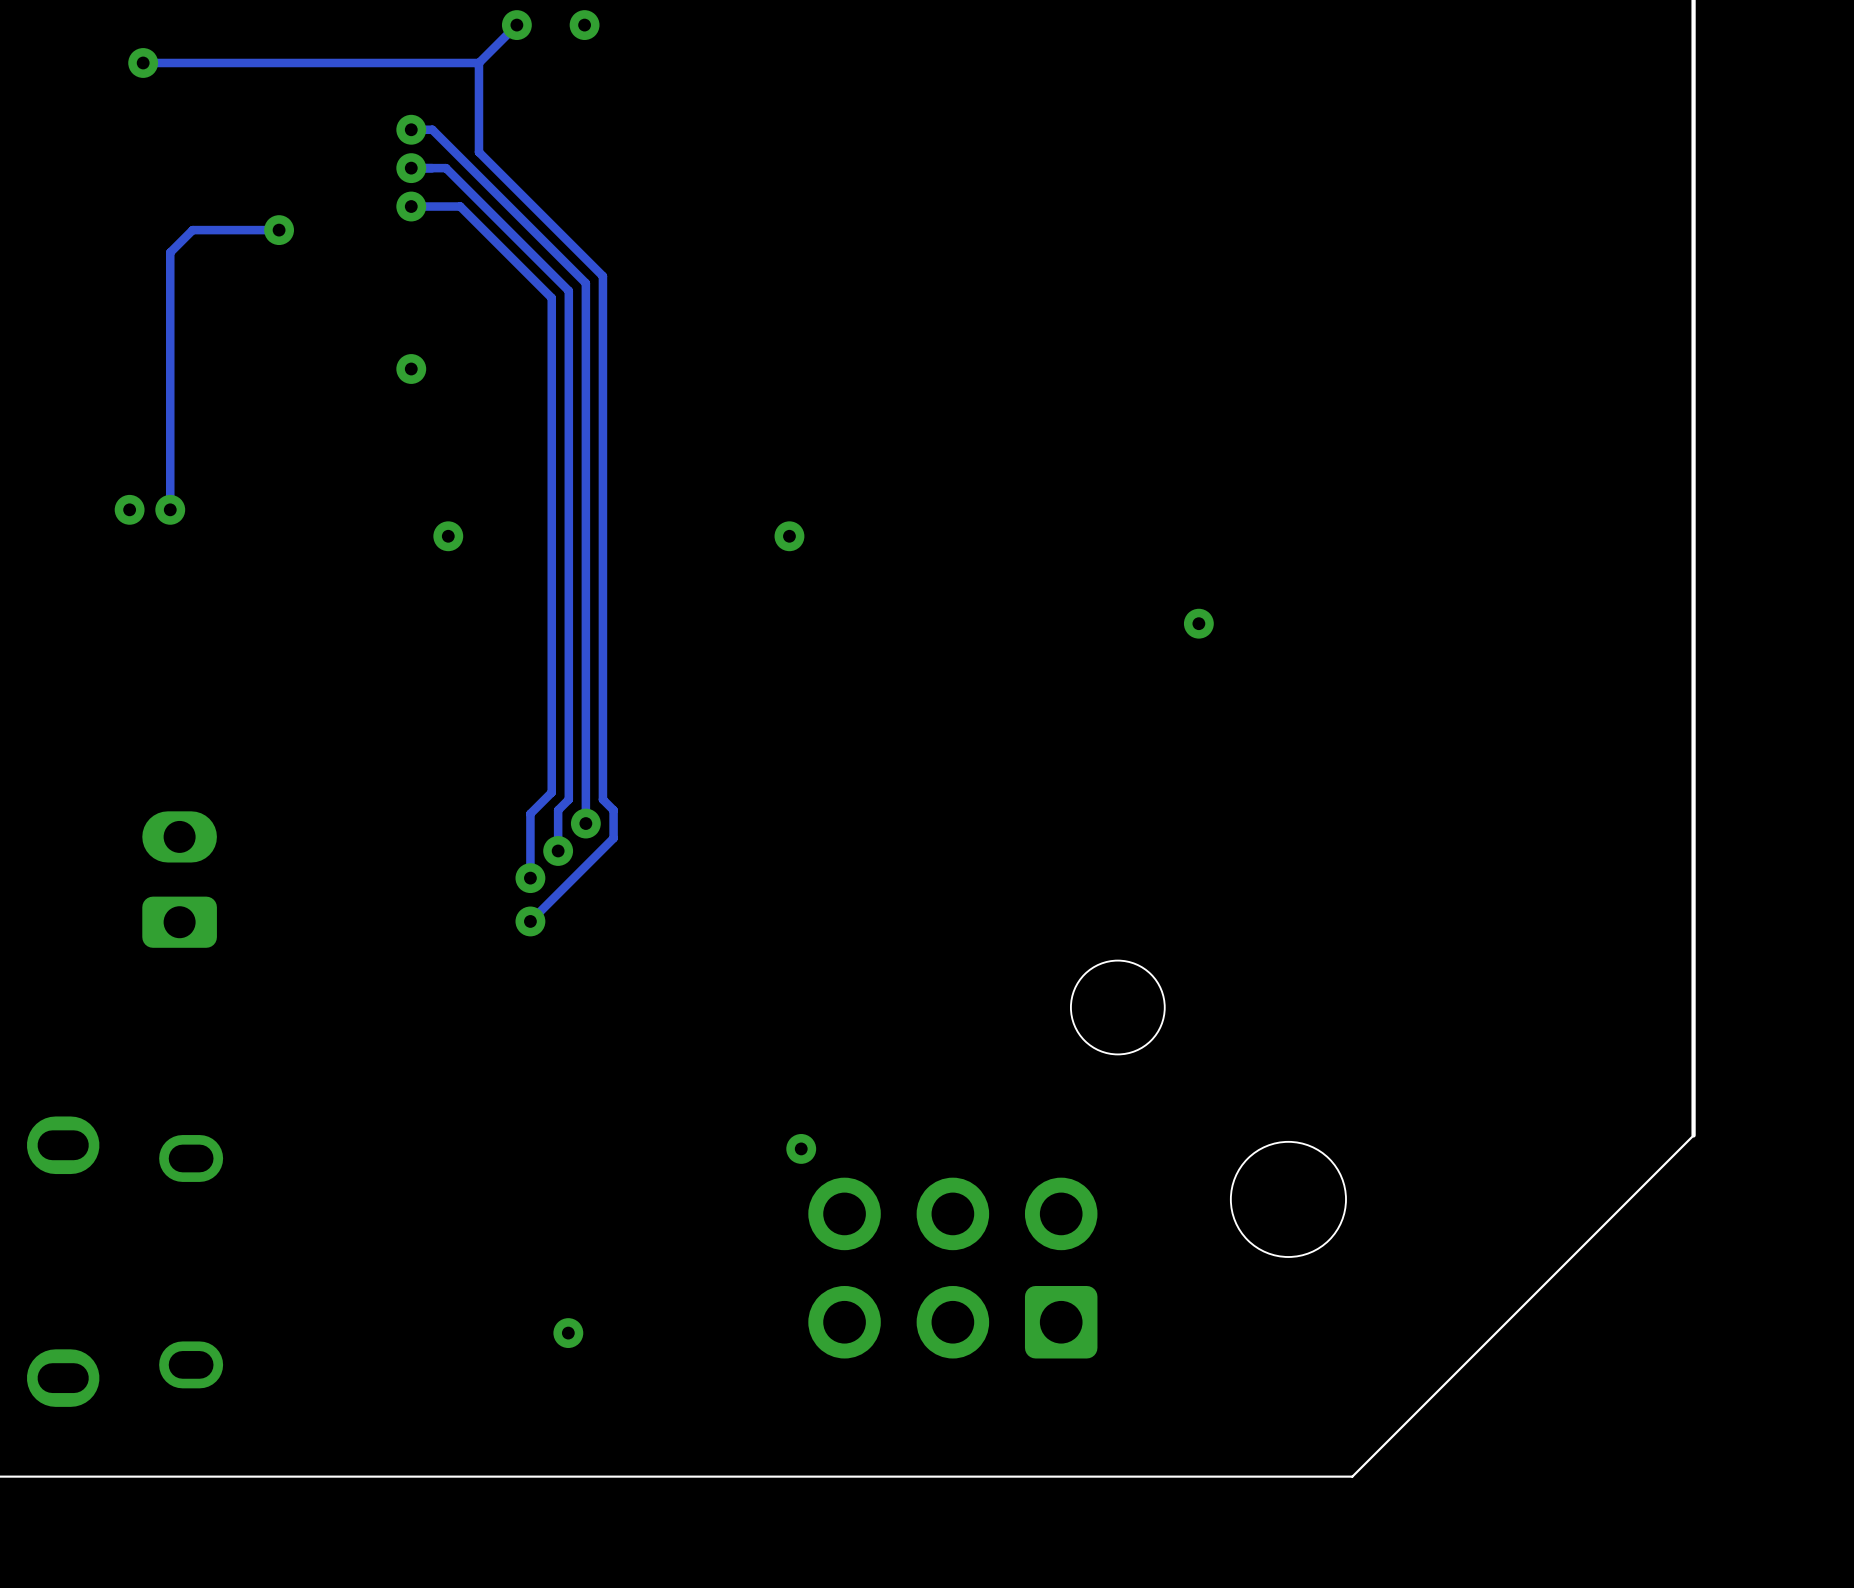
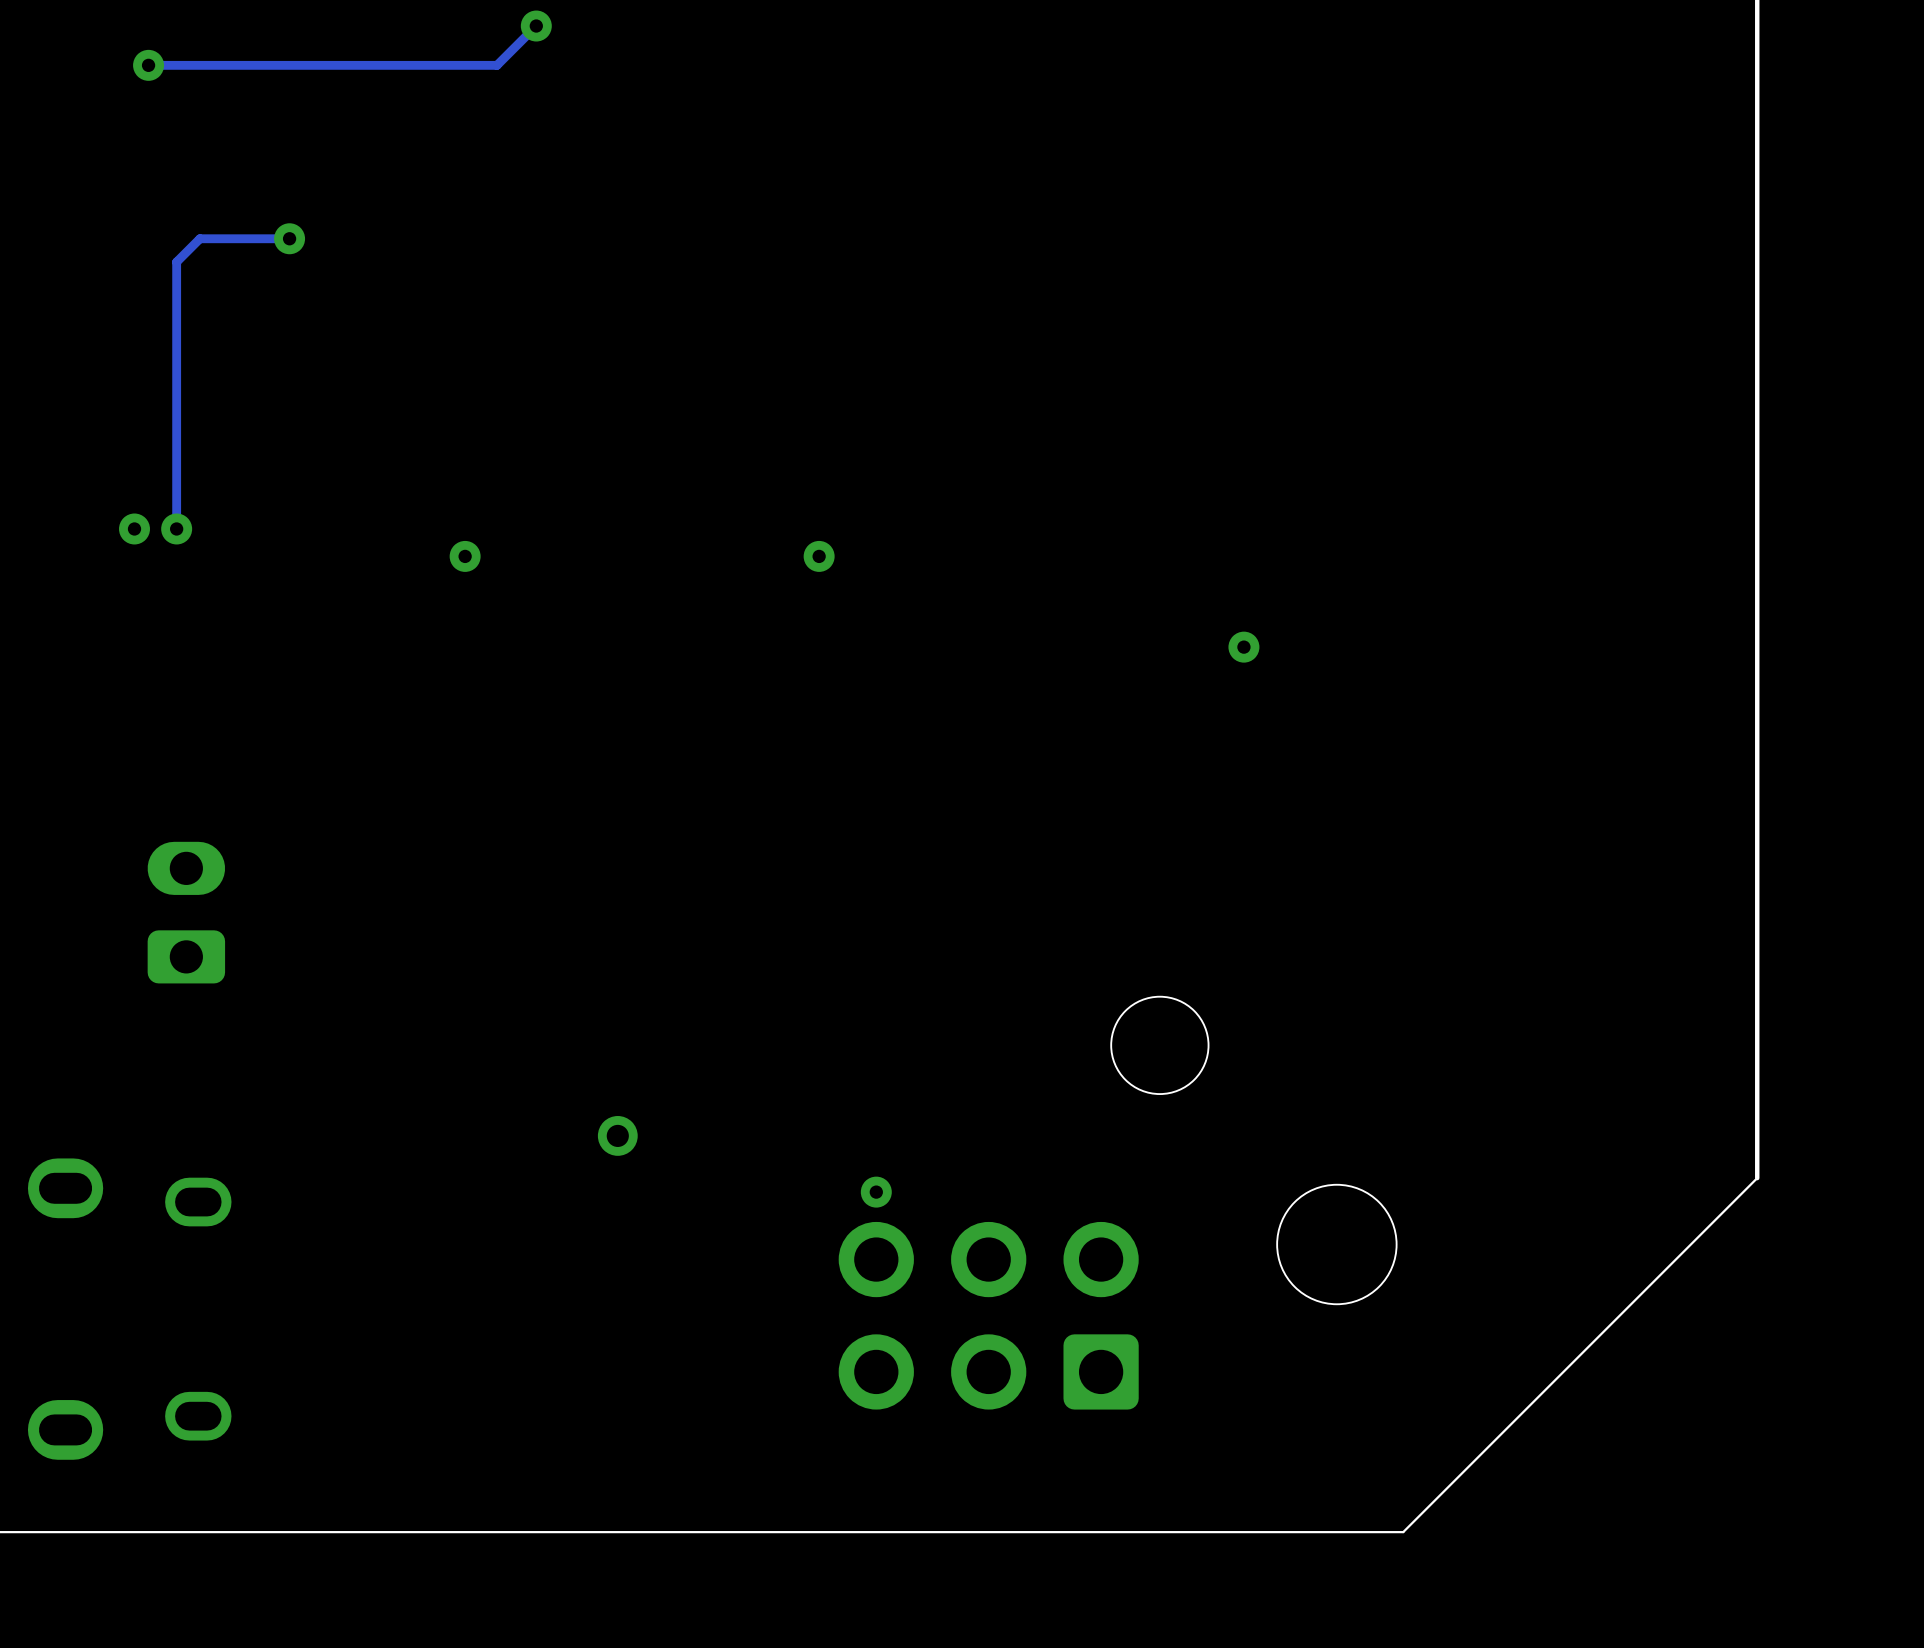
via: (584, 25) -> none
track: (478, 62) (478, 152) (602, 276) (602, 799) (613, 810) (613, 838) (530, 921) -> none
track: (411, 129) (432, 129) (585, 283) (585, 823) -> none
via: (411, 129) -> none
track: (411, 168) (446, 168) (568, 290) (568, 799) (558, 810) (558, 850) -> none
via: (411, 168) -> none
track: (411, 206) (460, 206) (551, 298) (551, 792) (530, 813) (530, 878) -> none
via: (411, 206) -> none
via: (411, 369) -> none
via: (585, 823) -> none
via: (558, 850) -> none
via: (530, 878) -> none
via: (530, 921) -> none
via: none -> (617, 1135)
via position: (801, 1148) -> (876, 1192)
via: (568, 1333) -> none

